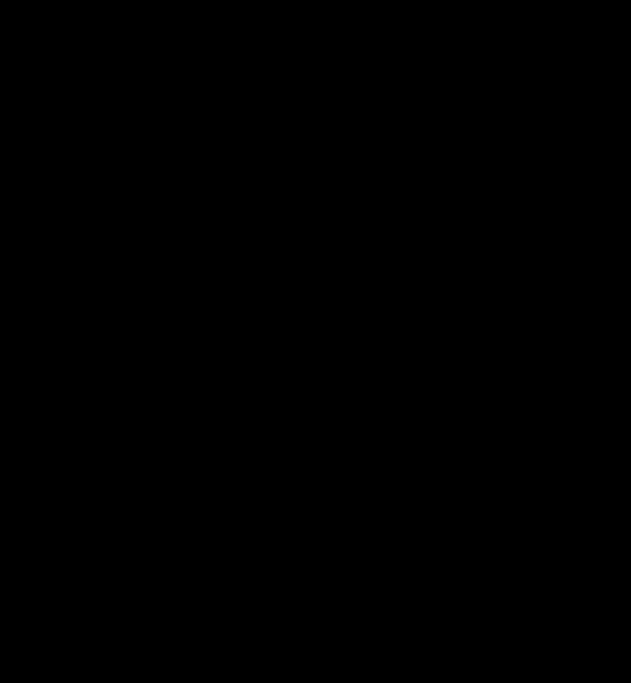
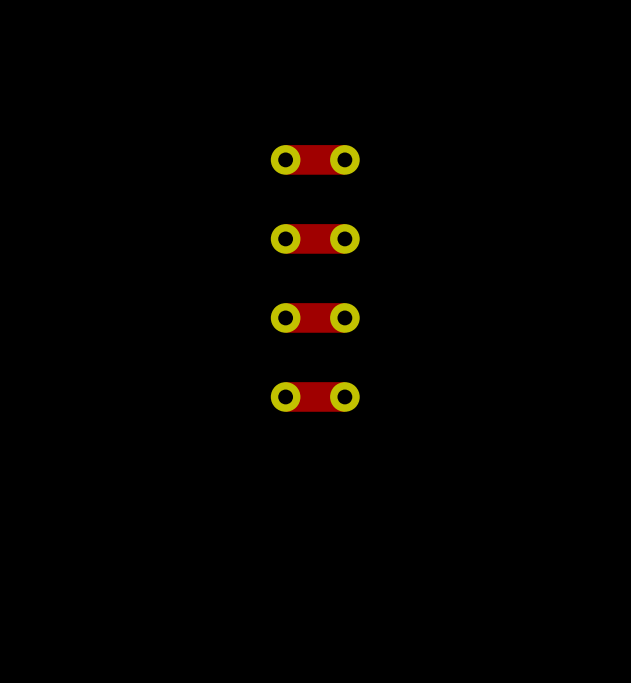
part: none -> (315, 159)
part: none -> (315, 238)
part: none -> (315, 317)
part: none -> (315, 396)

